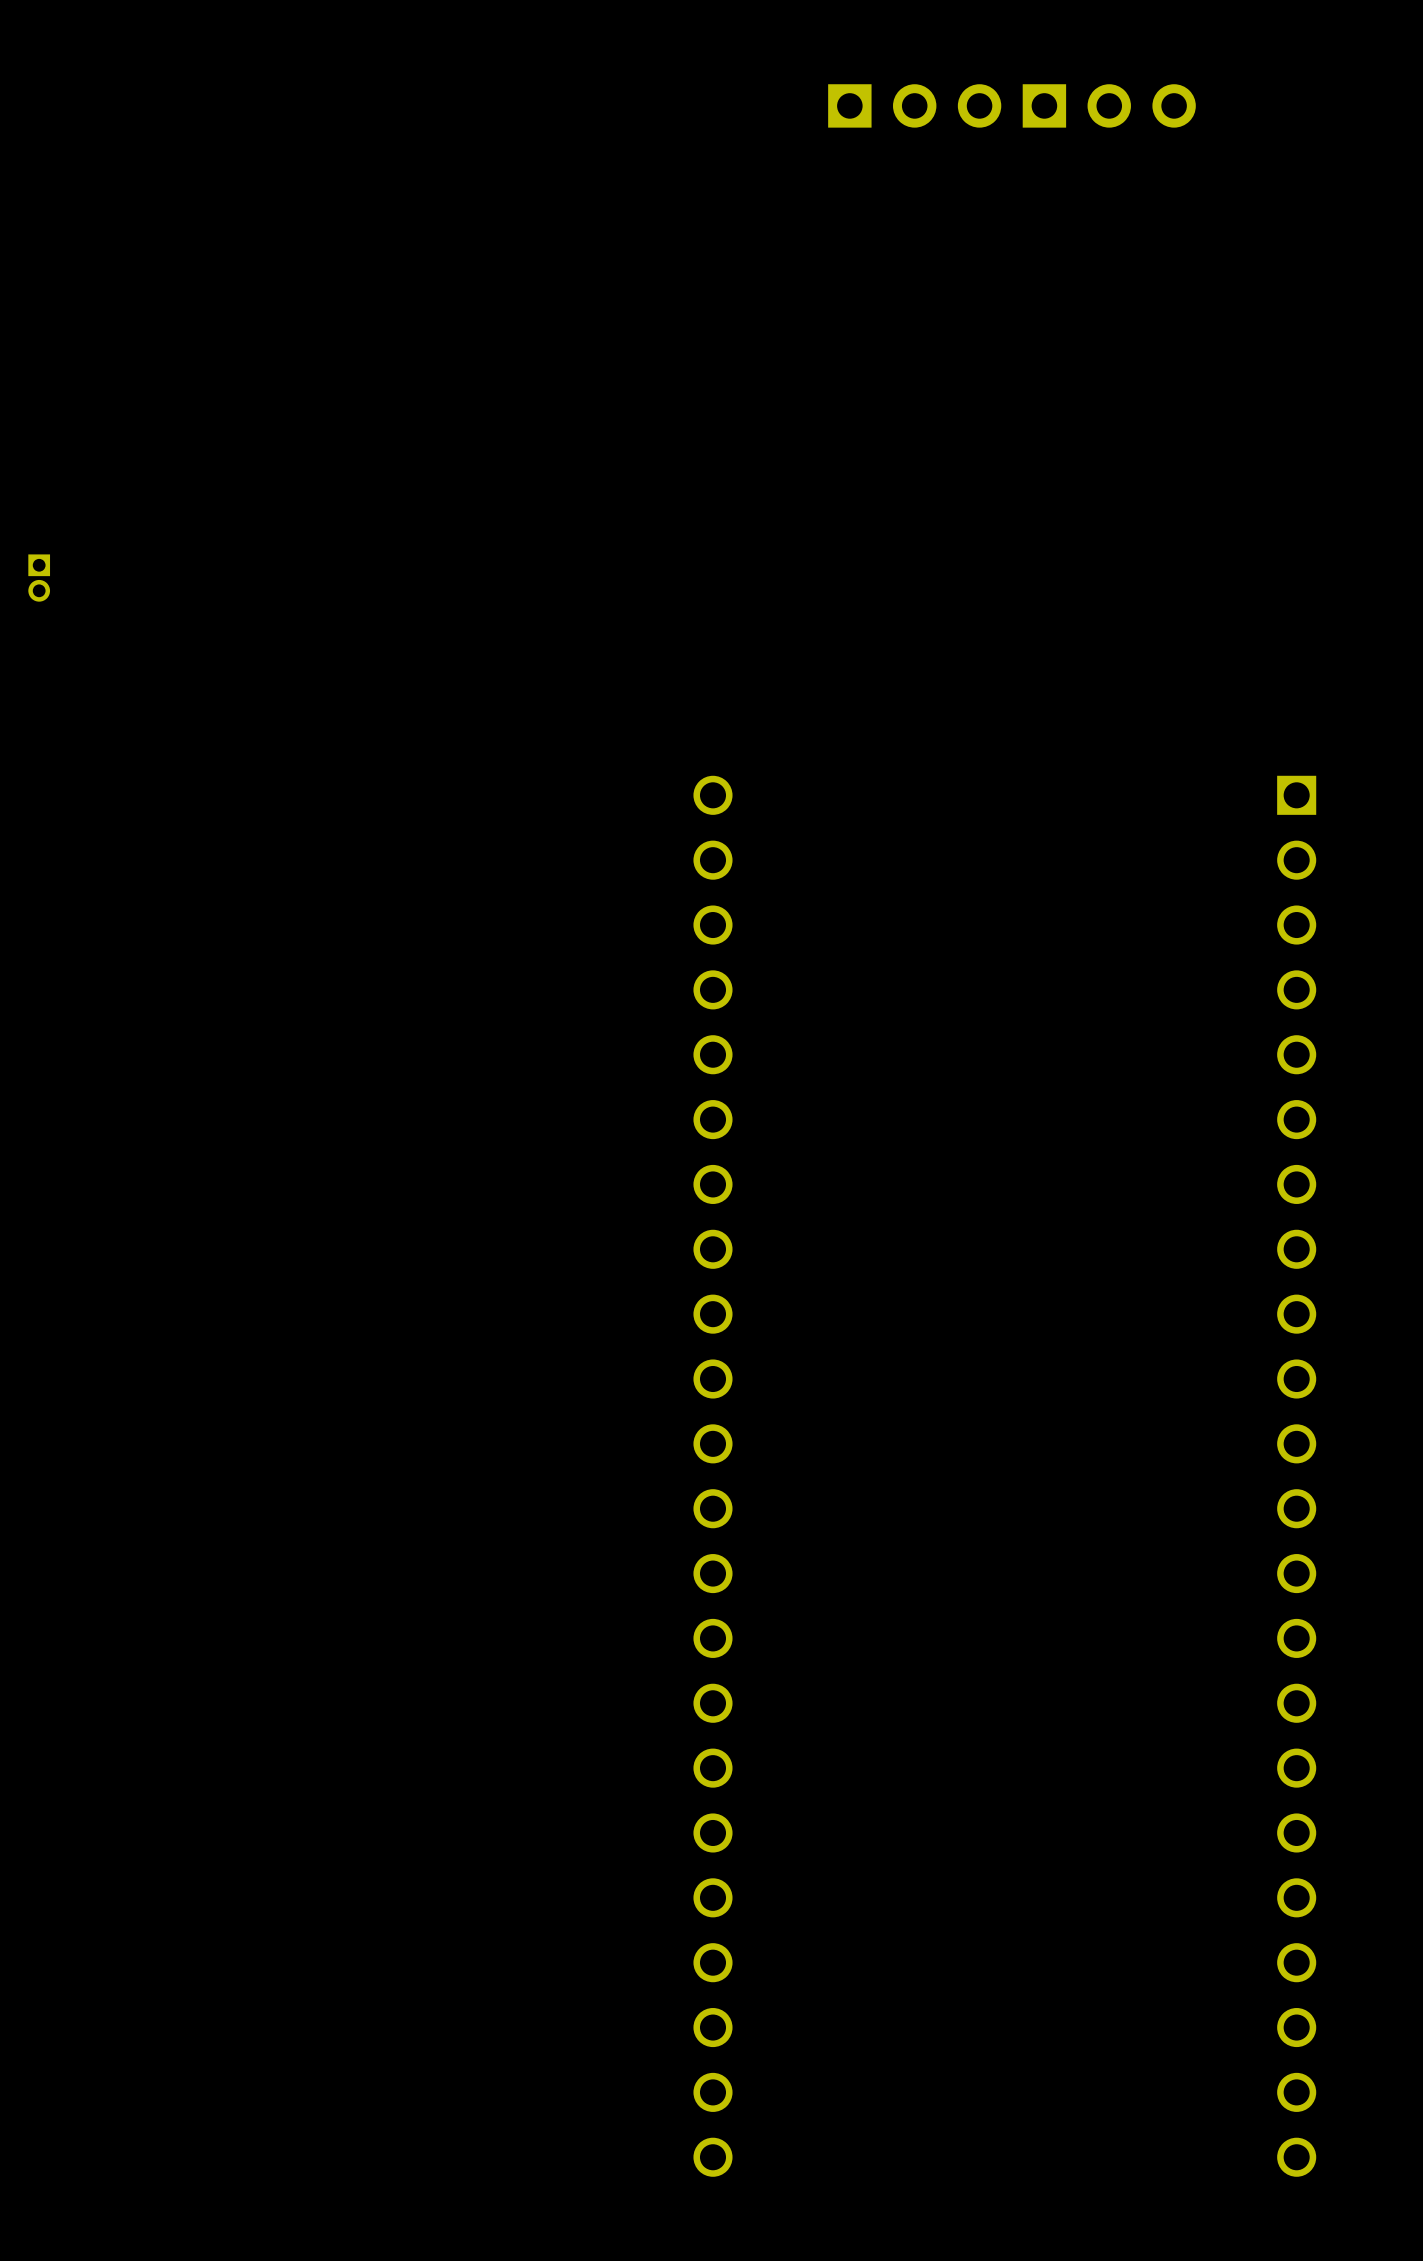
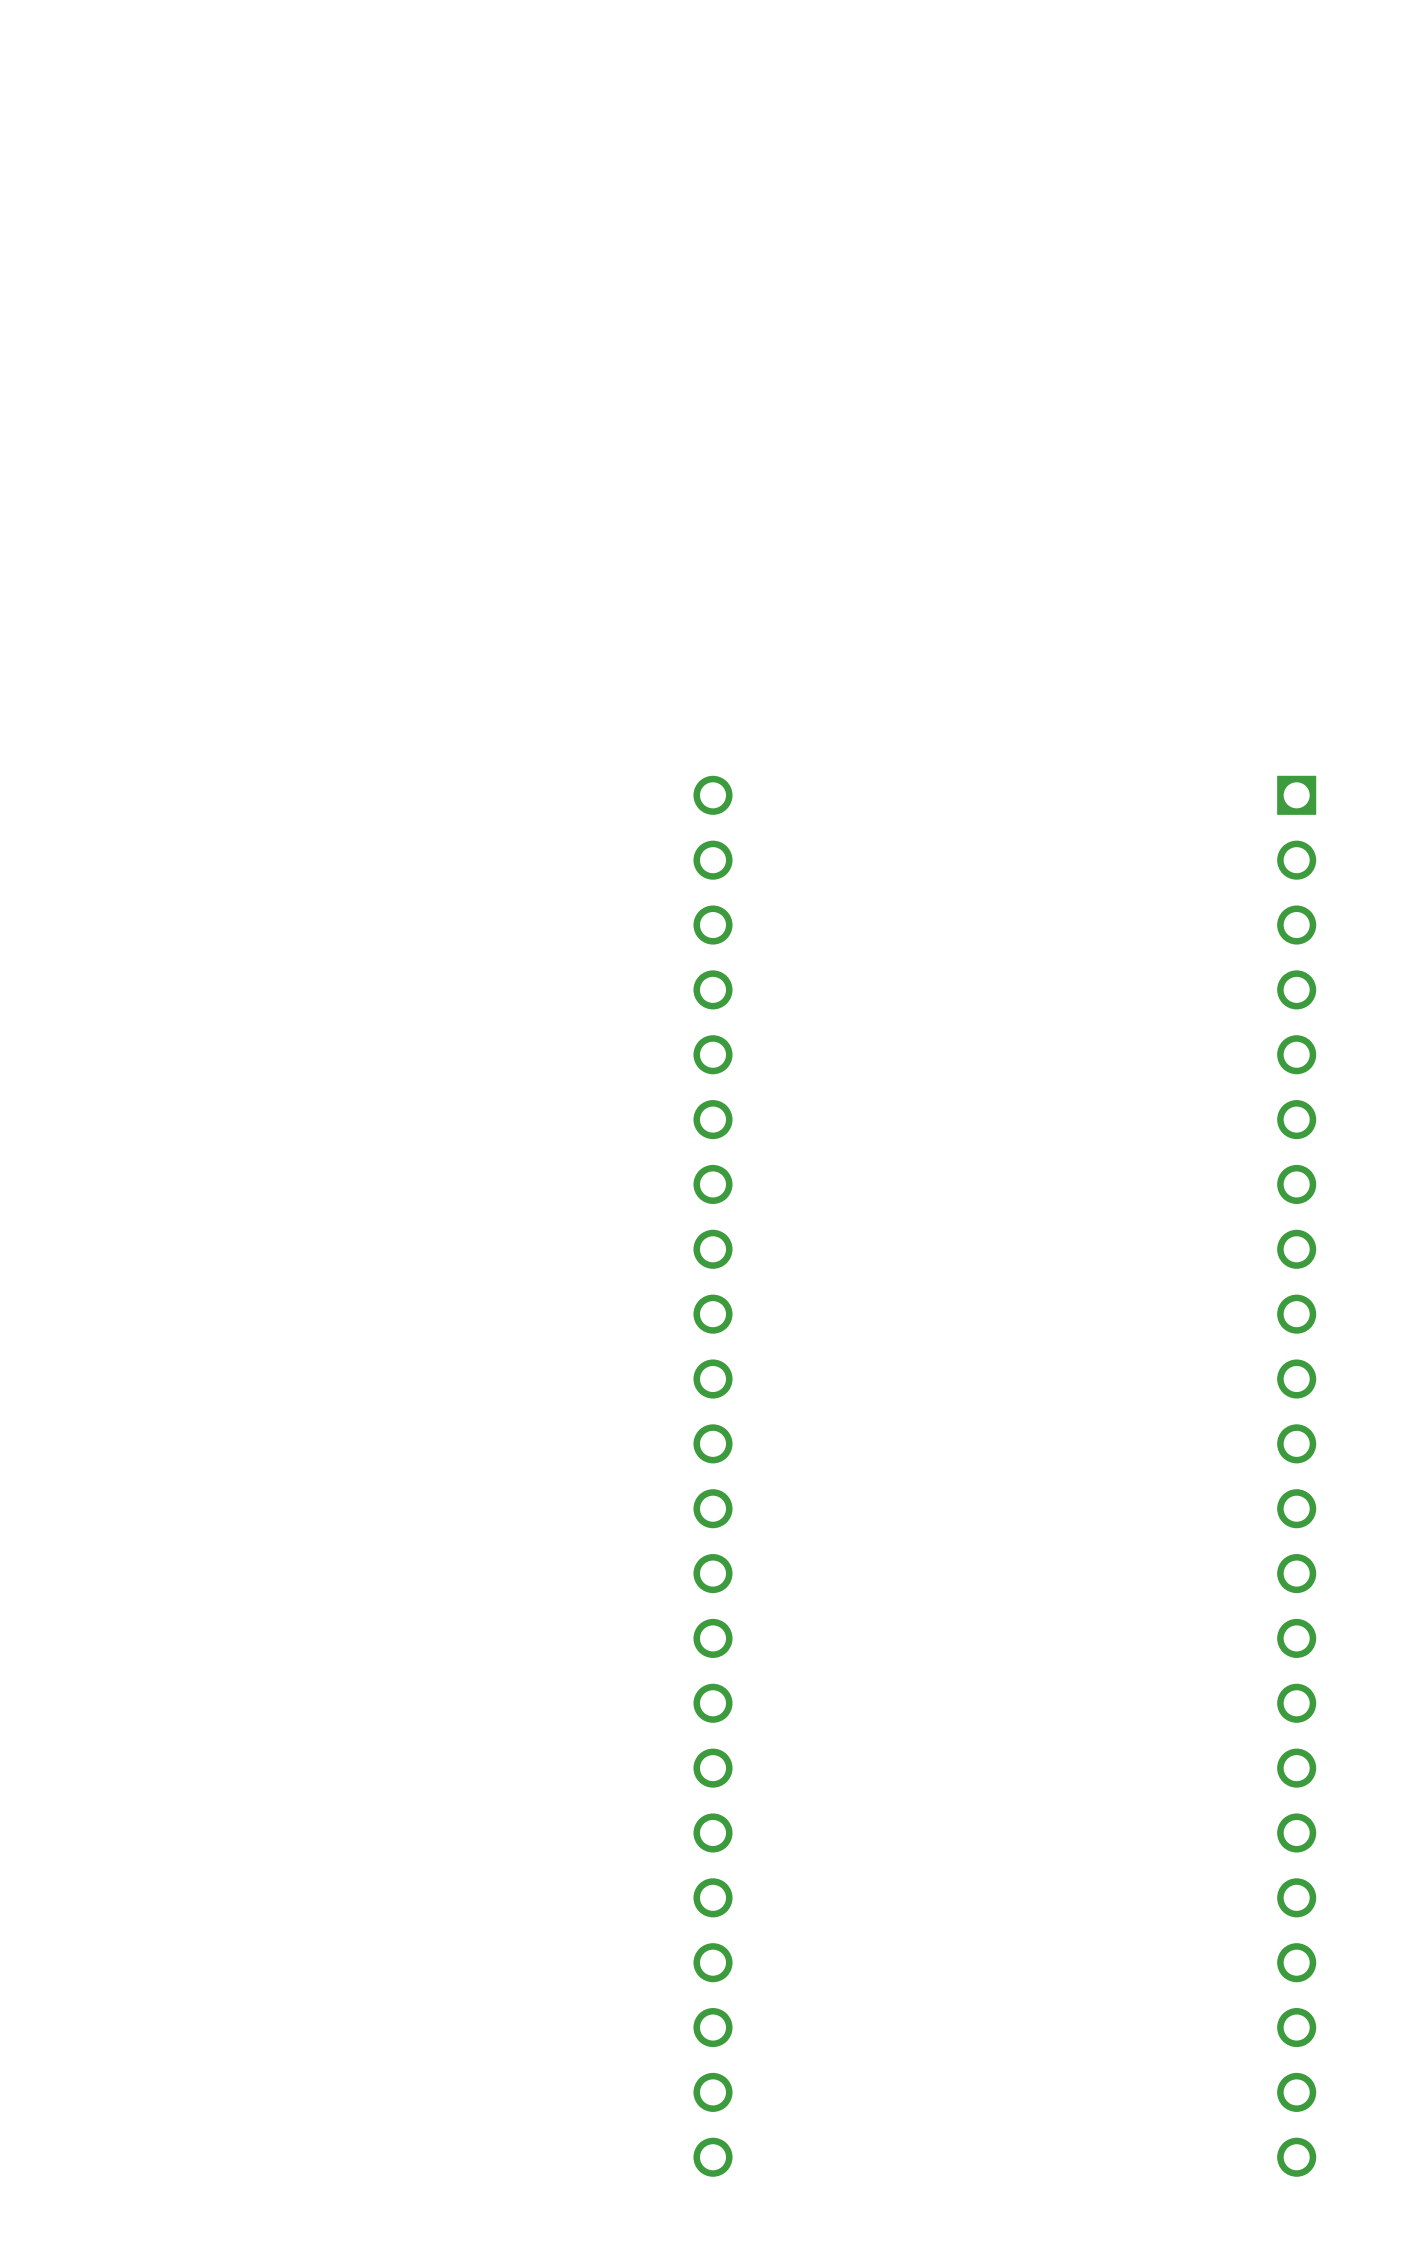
part: (1011, 105) -> none
part: (39, 578) -> none

